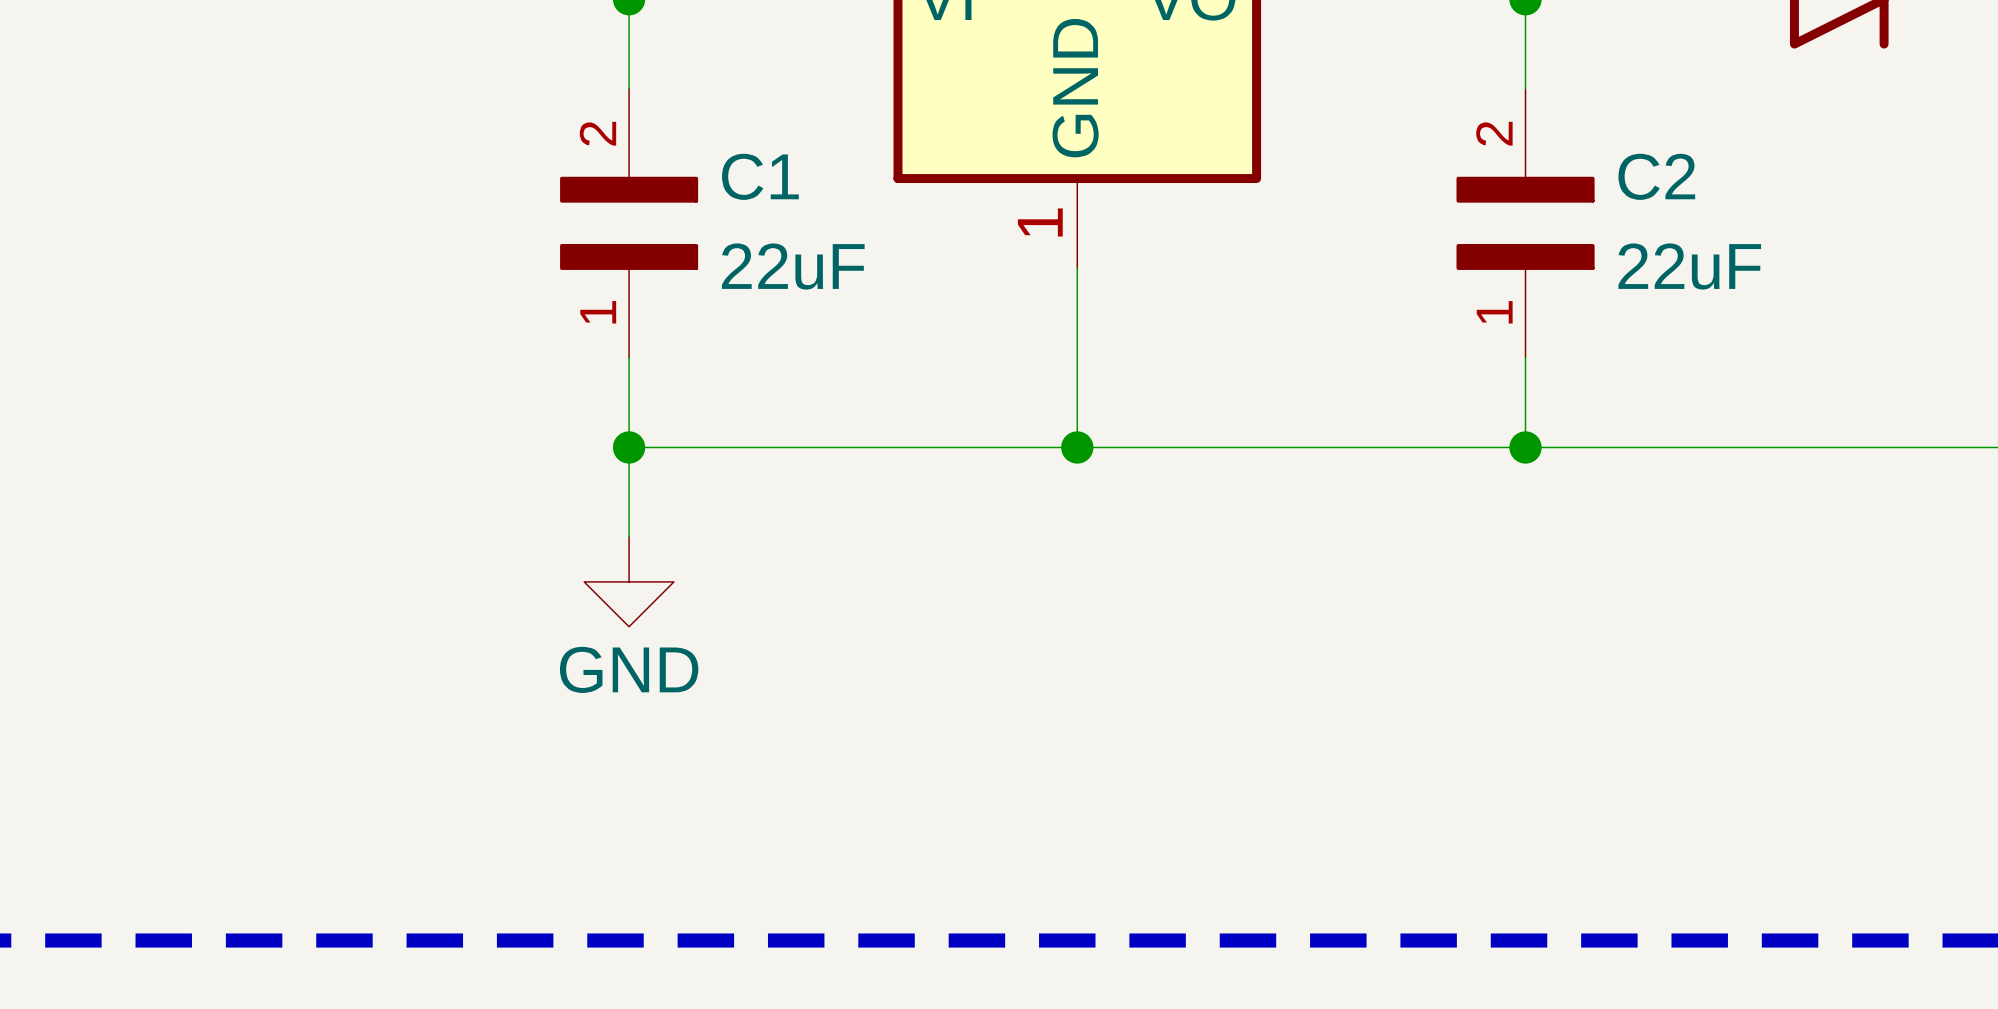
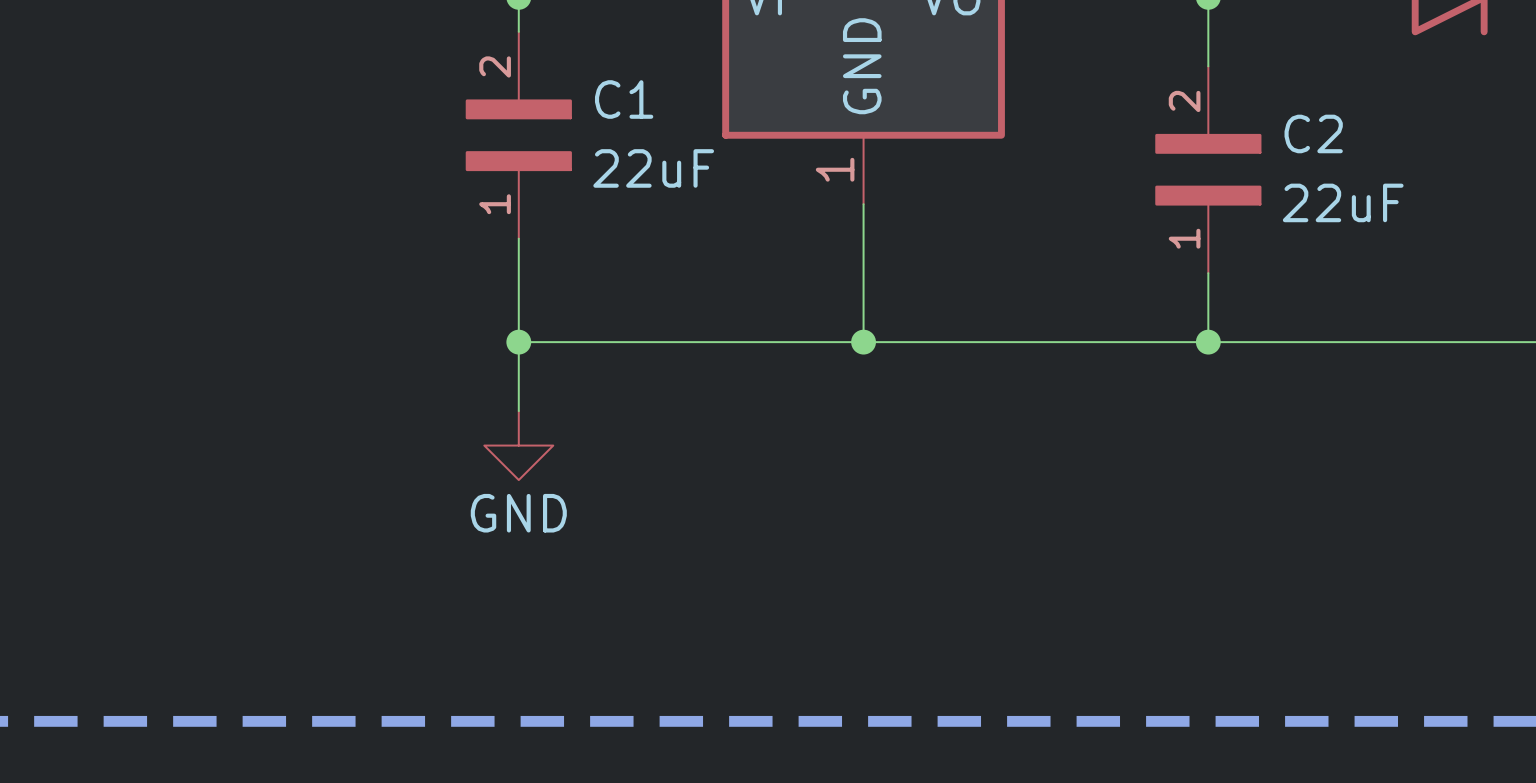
C1 position: (629, 223) -> (518, 135)

